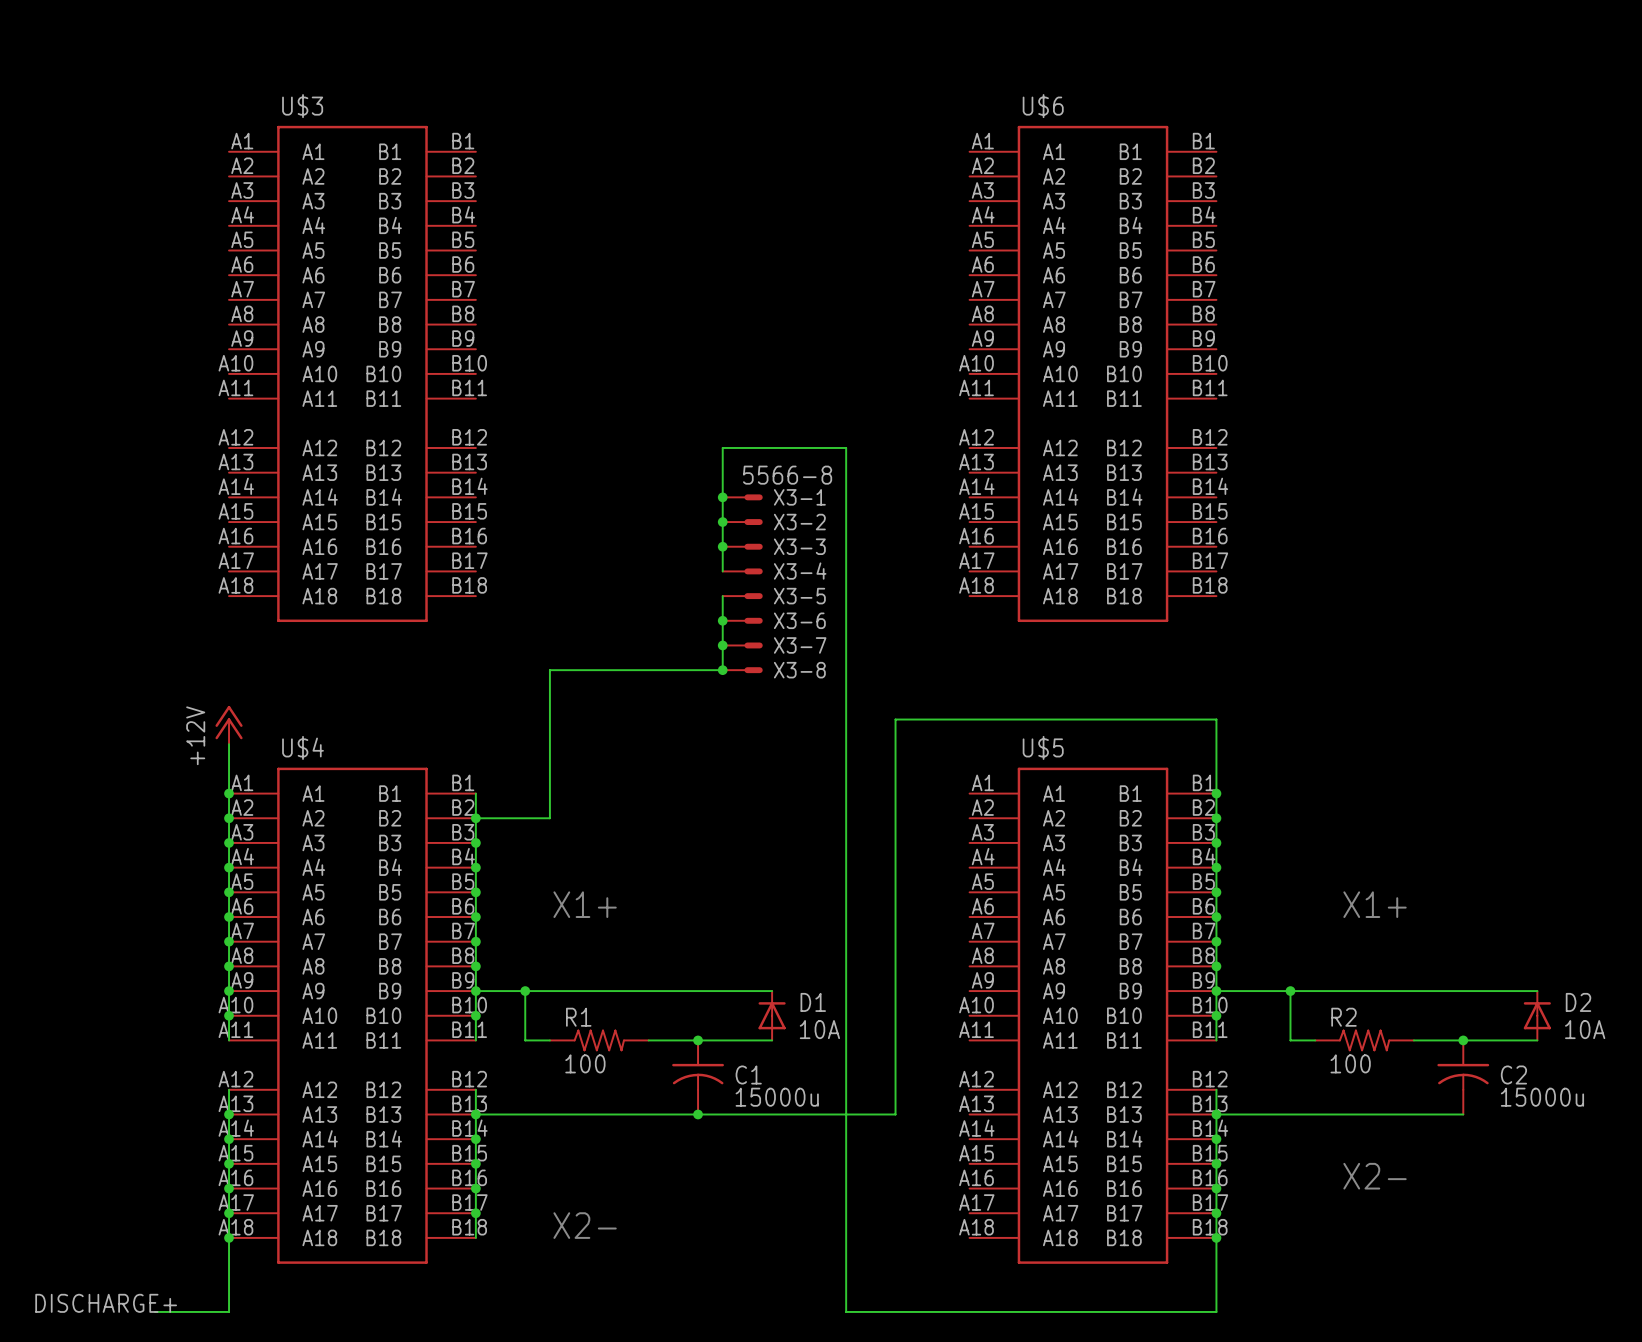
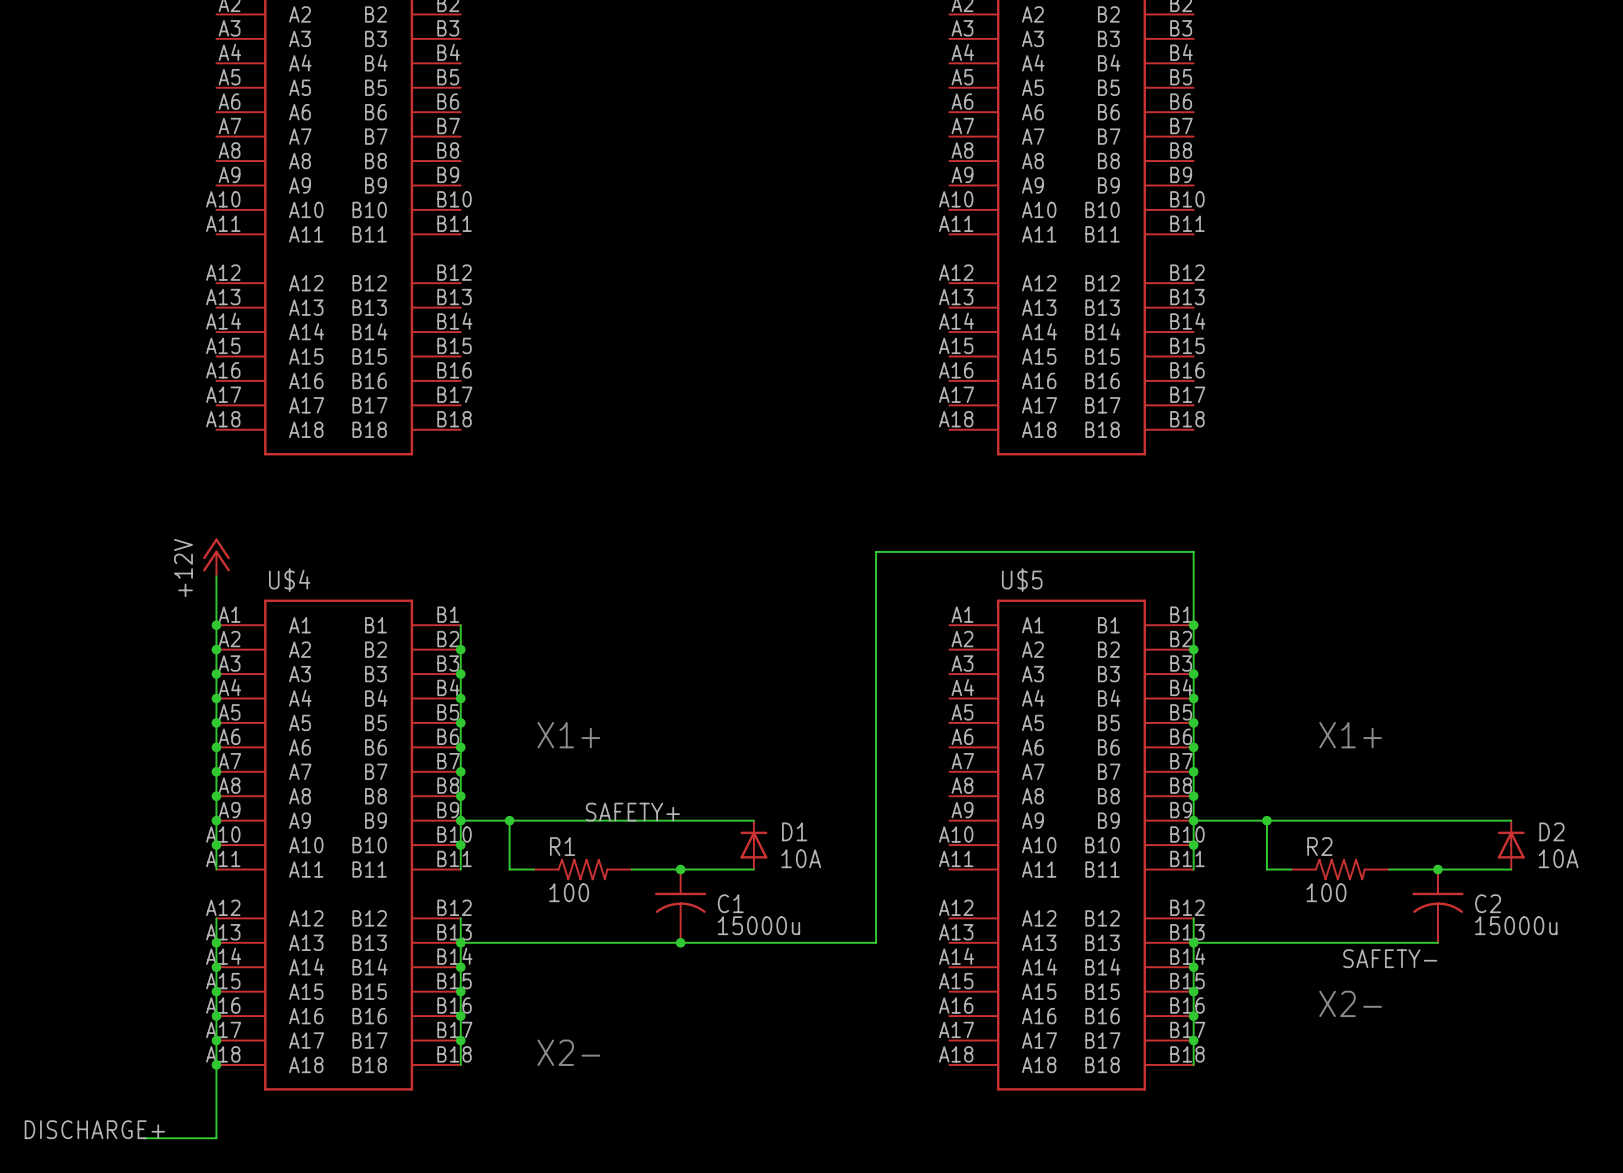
junction: (722, 497) -> none
X3-1: 5566-8 (742, 497) -> none
junction: (722, 522) -> none
X3-2: (742, 522) -> none
junction: (722, 546) -> none
X3-3: (742, 546) -> none
wire: (722, 571) (722, 447) (846, 447) (846, 1311) (1216, 1311) (1216, 1237) -> none
X3-4: (742, 571) -> none
wire: (722, 596) (722, 670) (549, 670) (549, 818) (475, 818) -> none
X3-5: (742, 596) -> none
junction: (722, 620) -> none
X3-6: (742, 620) -> none
junction: (722, 645) -> none
X3-7: (742, 645) -> none
junction: (722, 670) -> none
X3-8: (742, 670) -> none
label: none -> SAFETY+ (632, 812)
label: none -> SAFETY- (1390, 958)
junction: (1216, 1237) -> none

